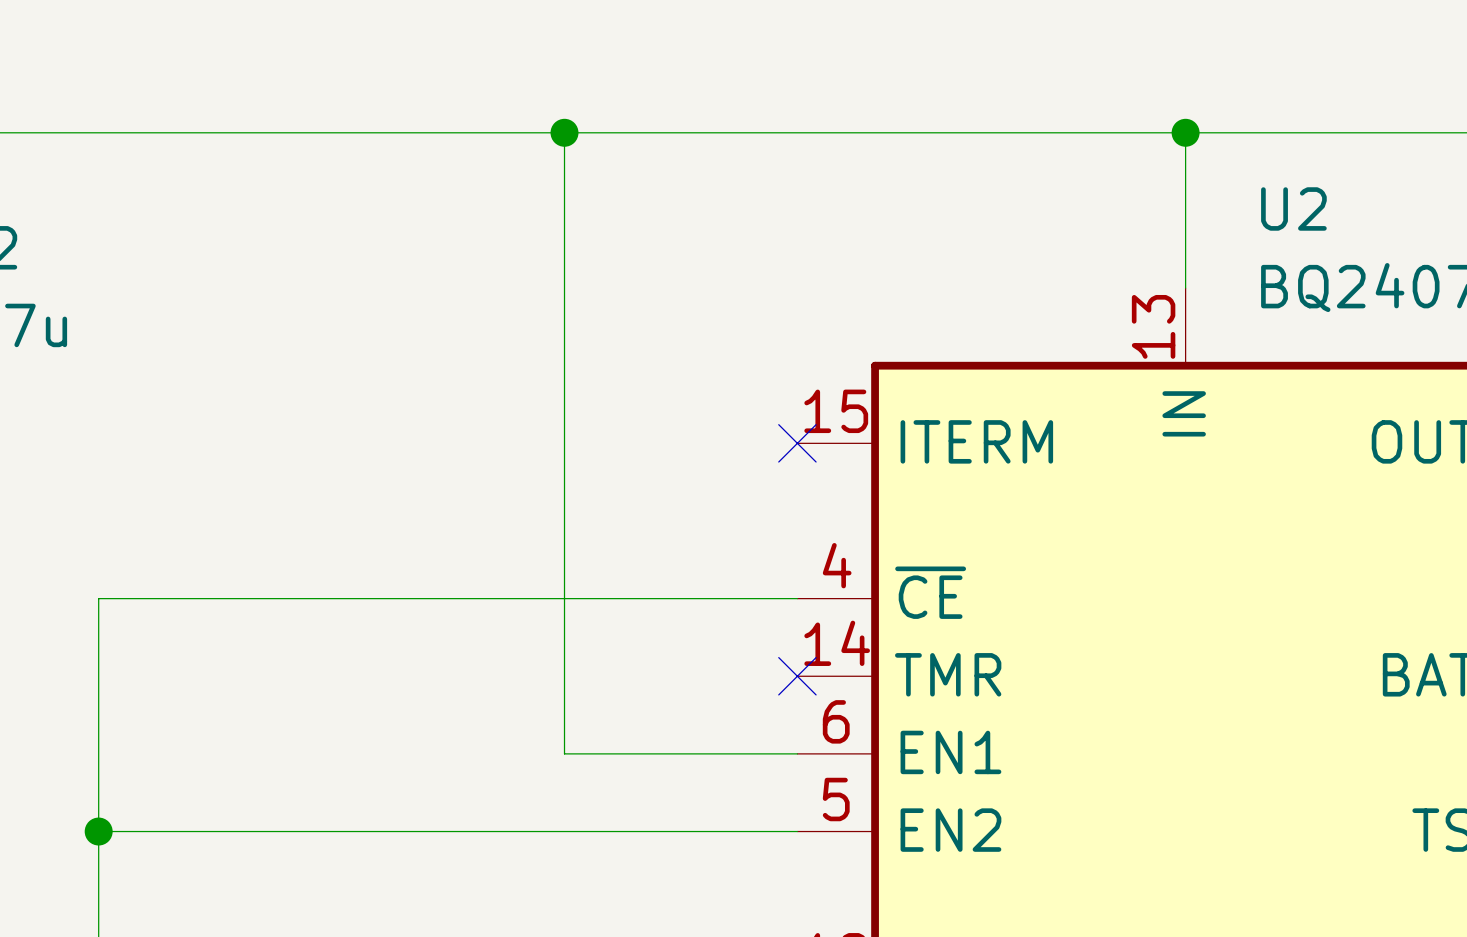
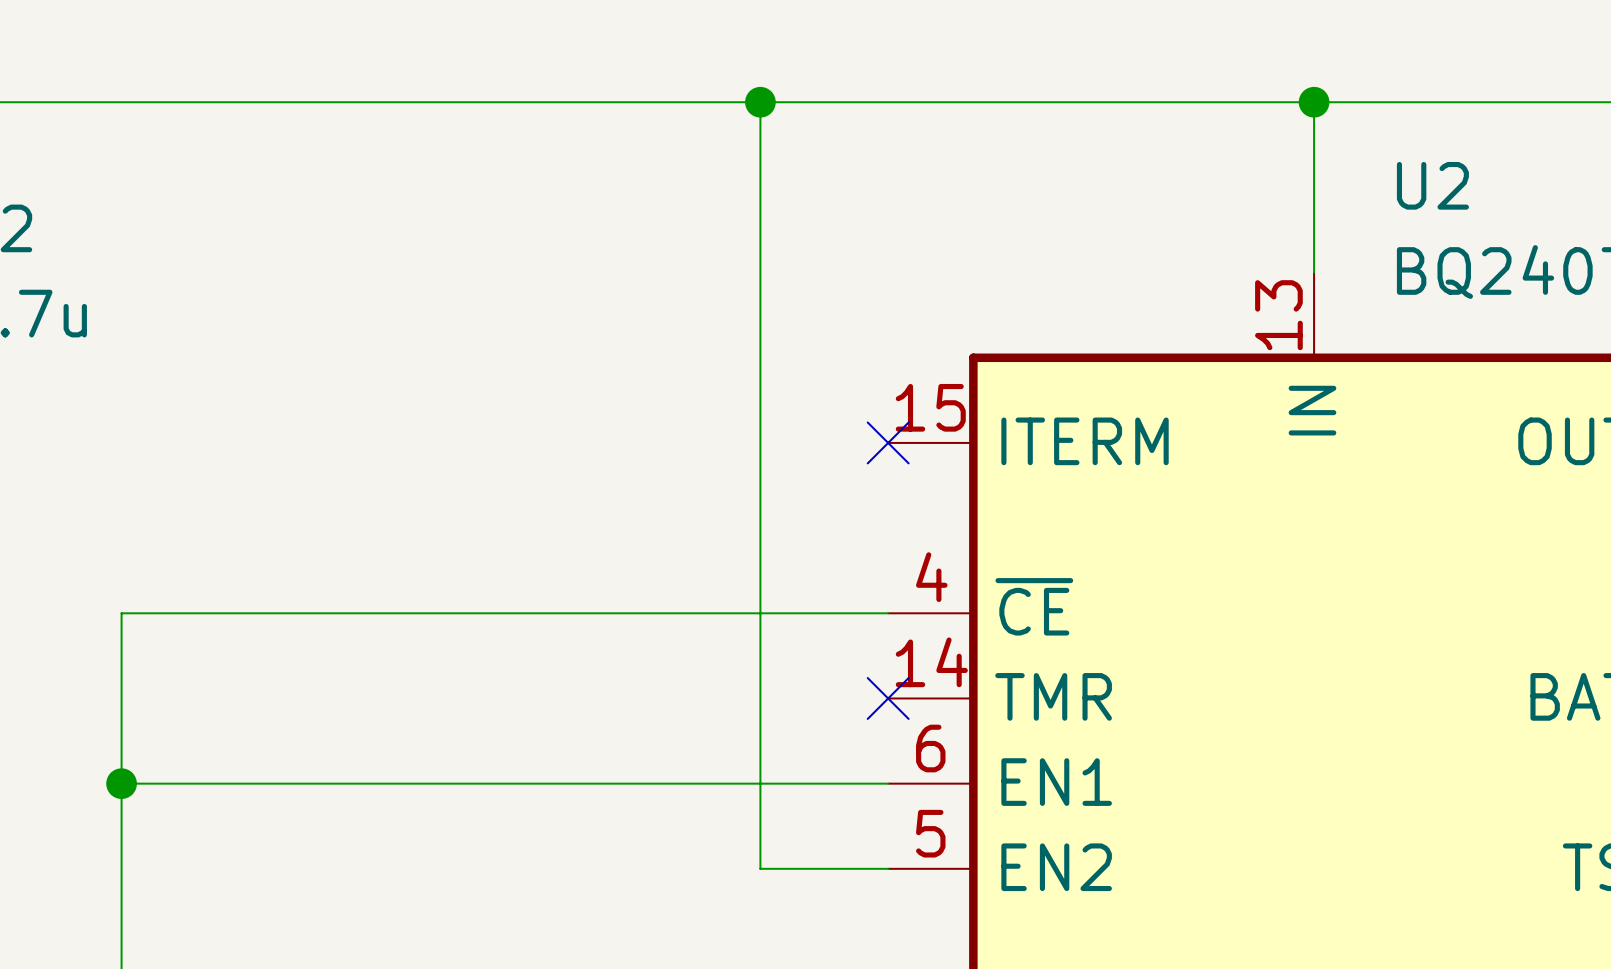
wire: (564, 132) (564, 753) -> (121, 783) (632, 783)
junction position: (564, 132) -> (760, 102)
wire: (98, 831) (680, 831) -> (760, 102) (760, 868)
junction position: (98, 831) -> (121, 783)

